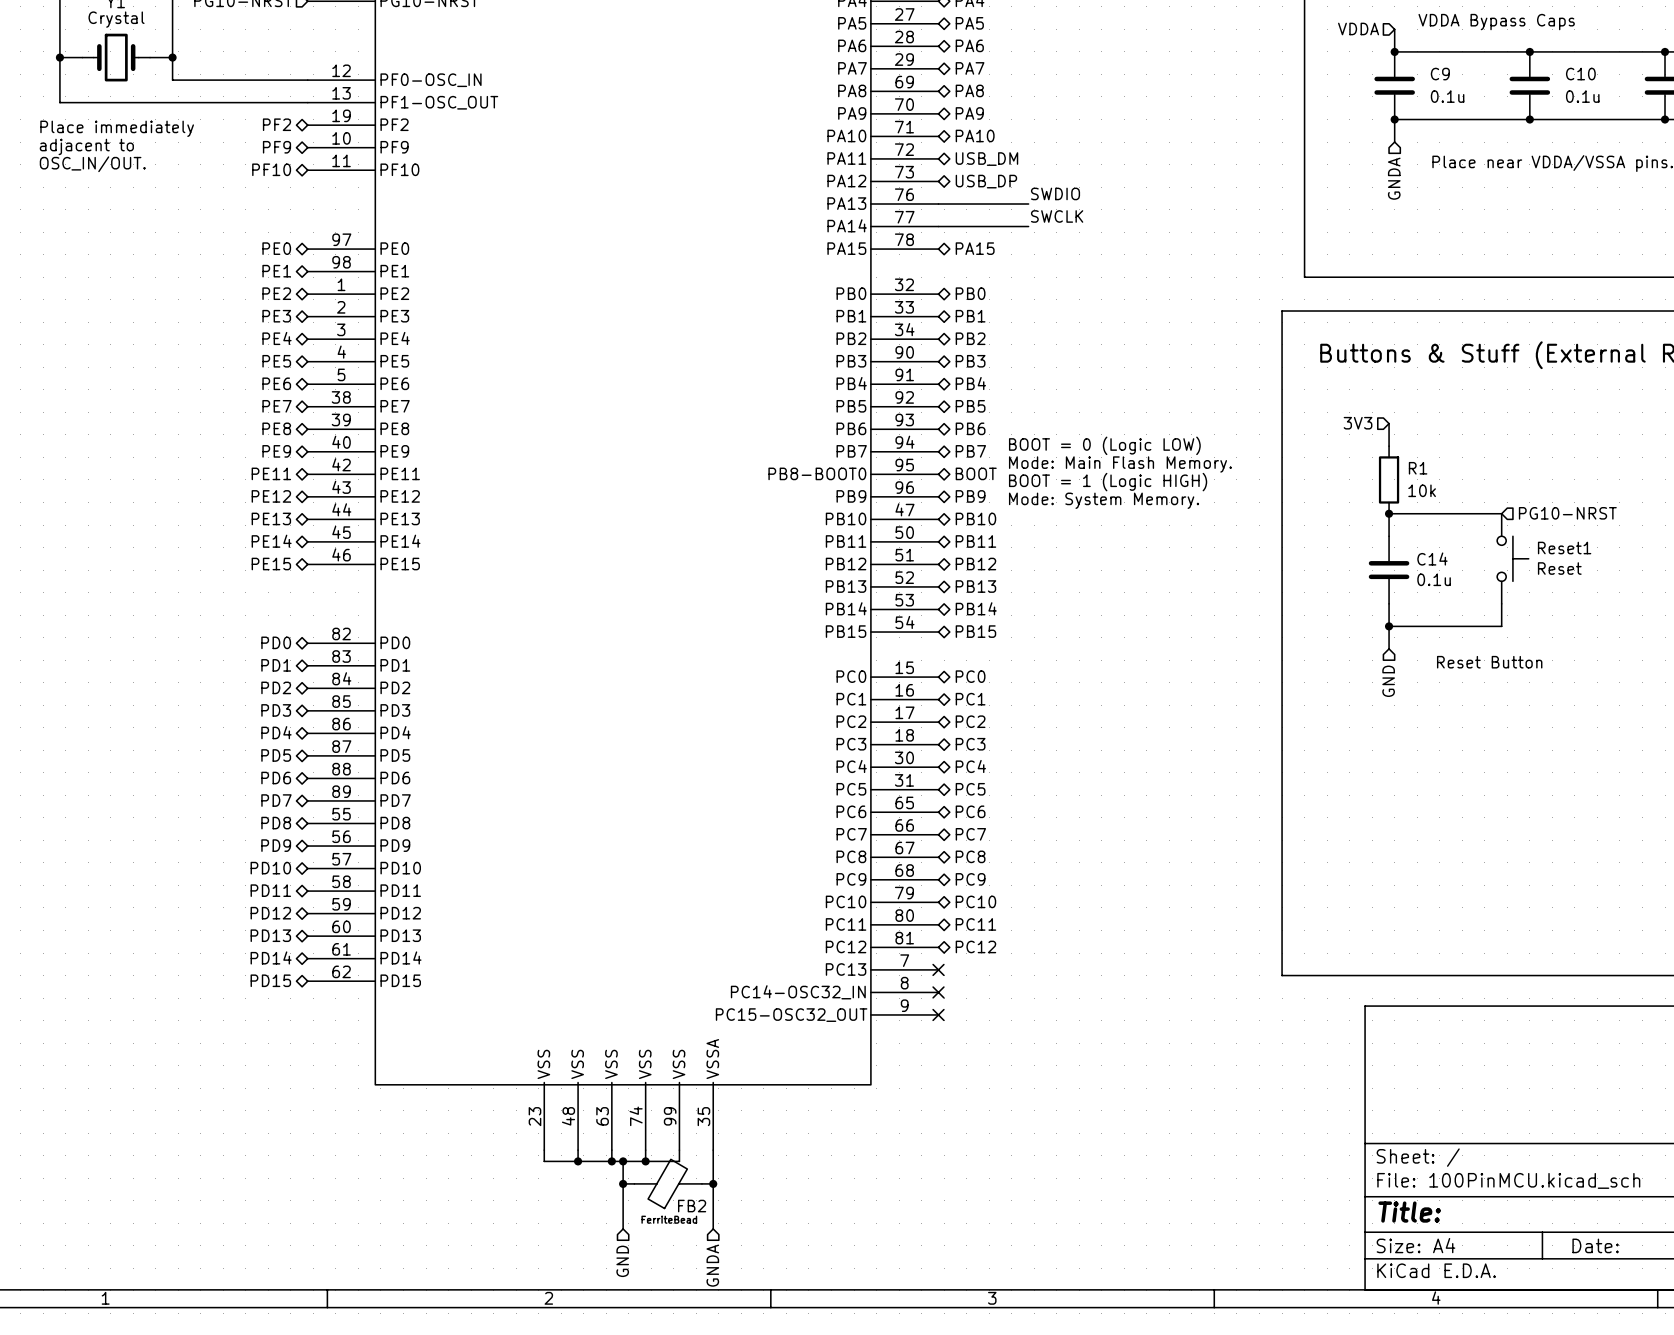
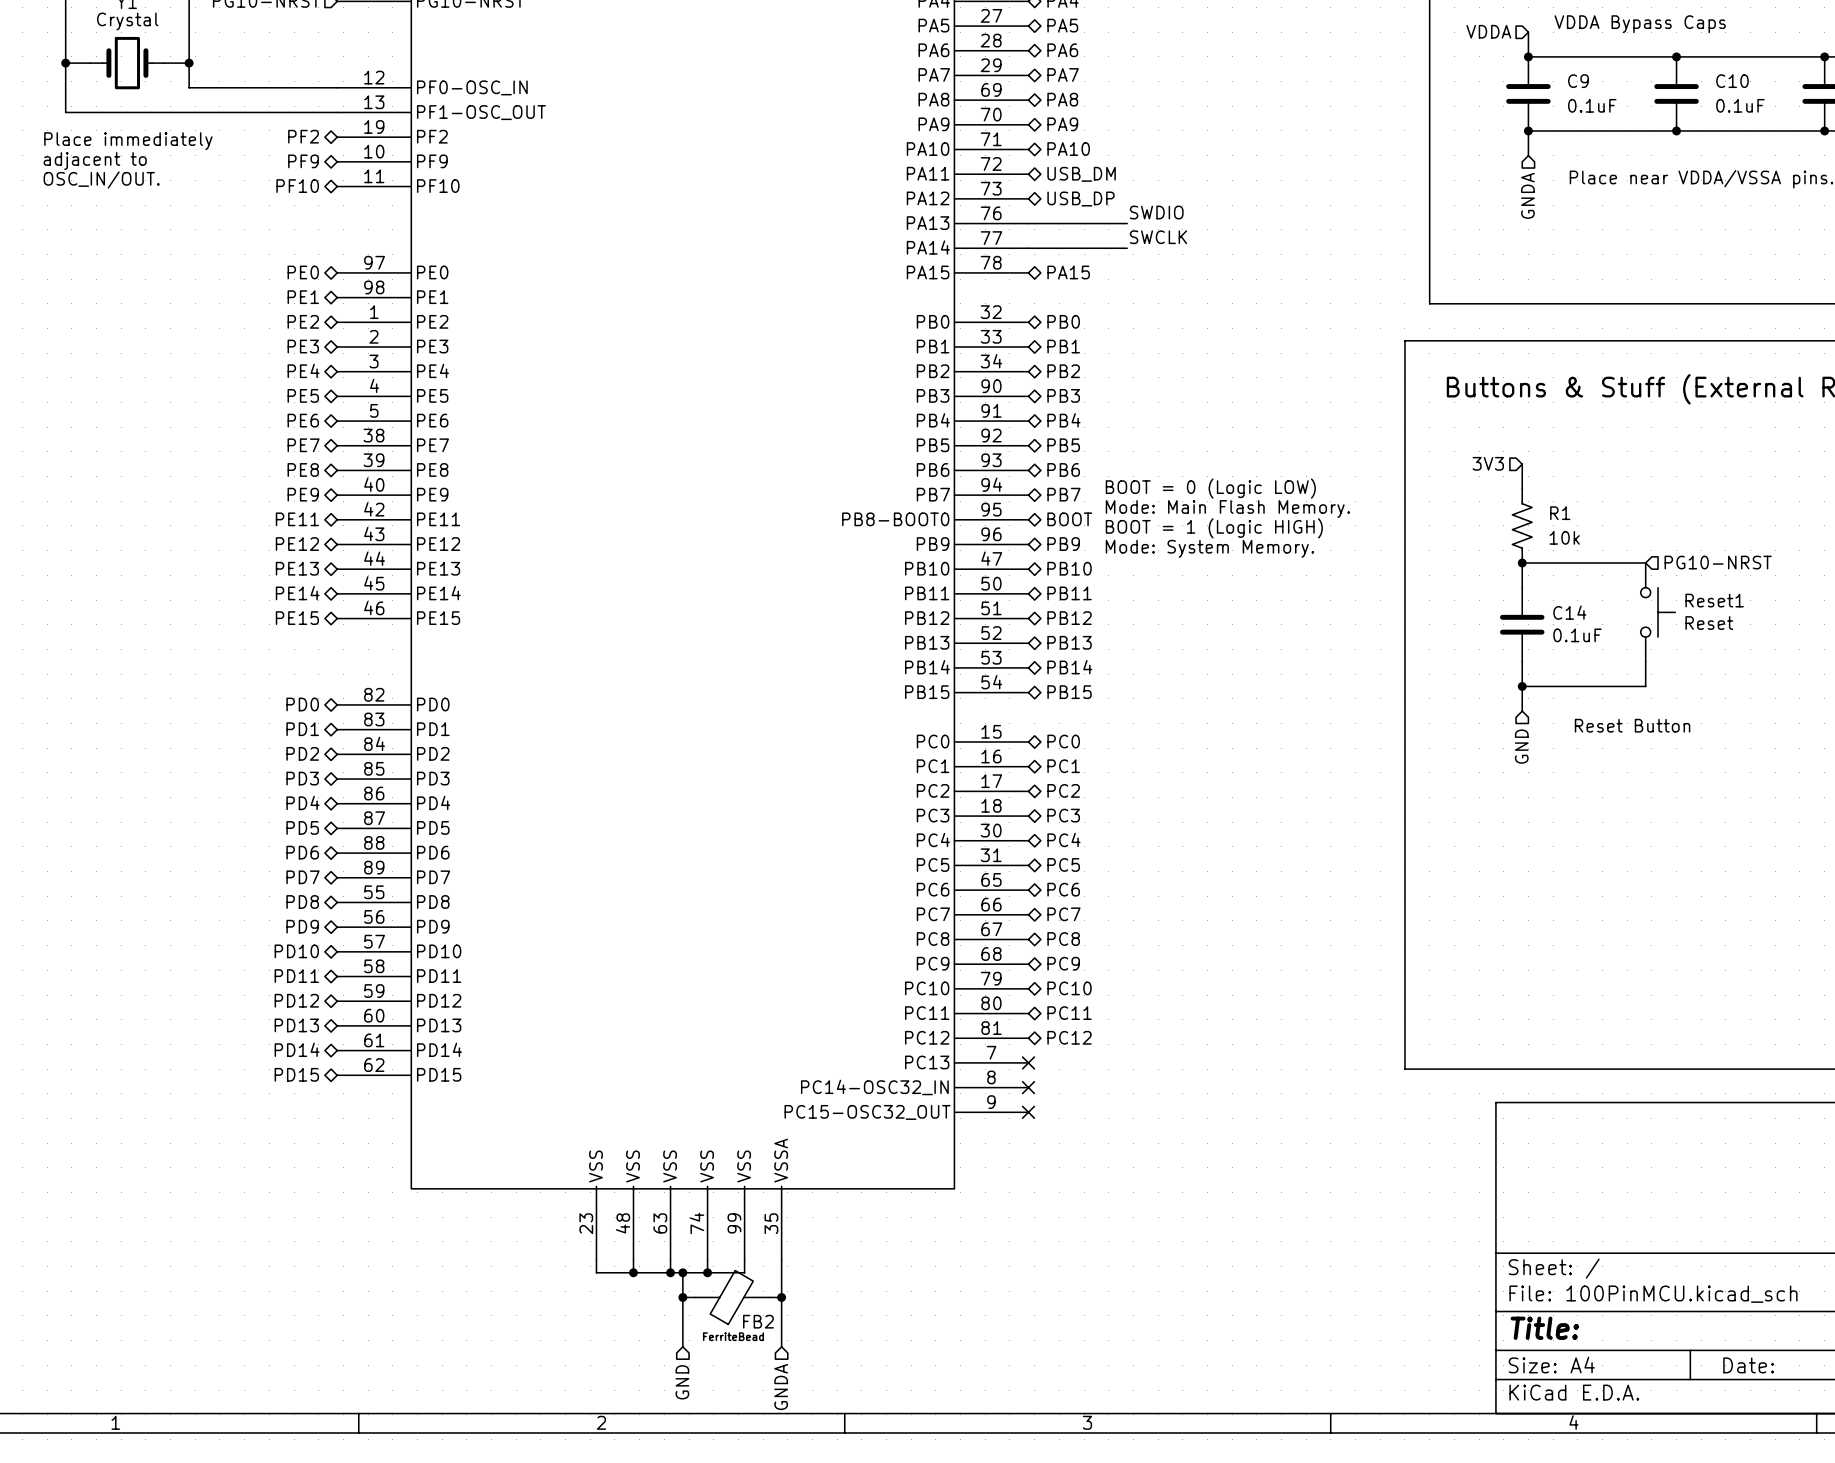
C9 value: 0.1u (1447, 96) -> 0.1uF (1592, 105)
C10 value: 0.1u (1582, 96) -> 0.1uF (1740, 105)
R1 symbol: [1378, 446, 1400, 514] -> [1512, 488, 1533, 564]
C14 value: 0.1u (1434, 579) -> 0.1uF (1577, 635)

